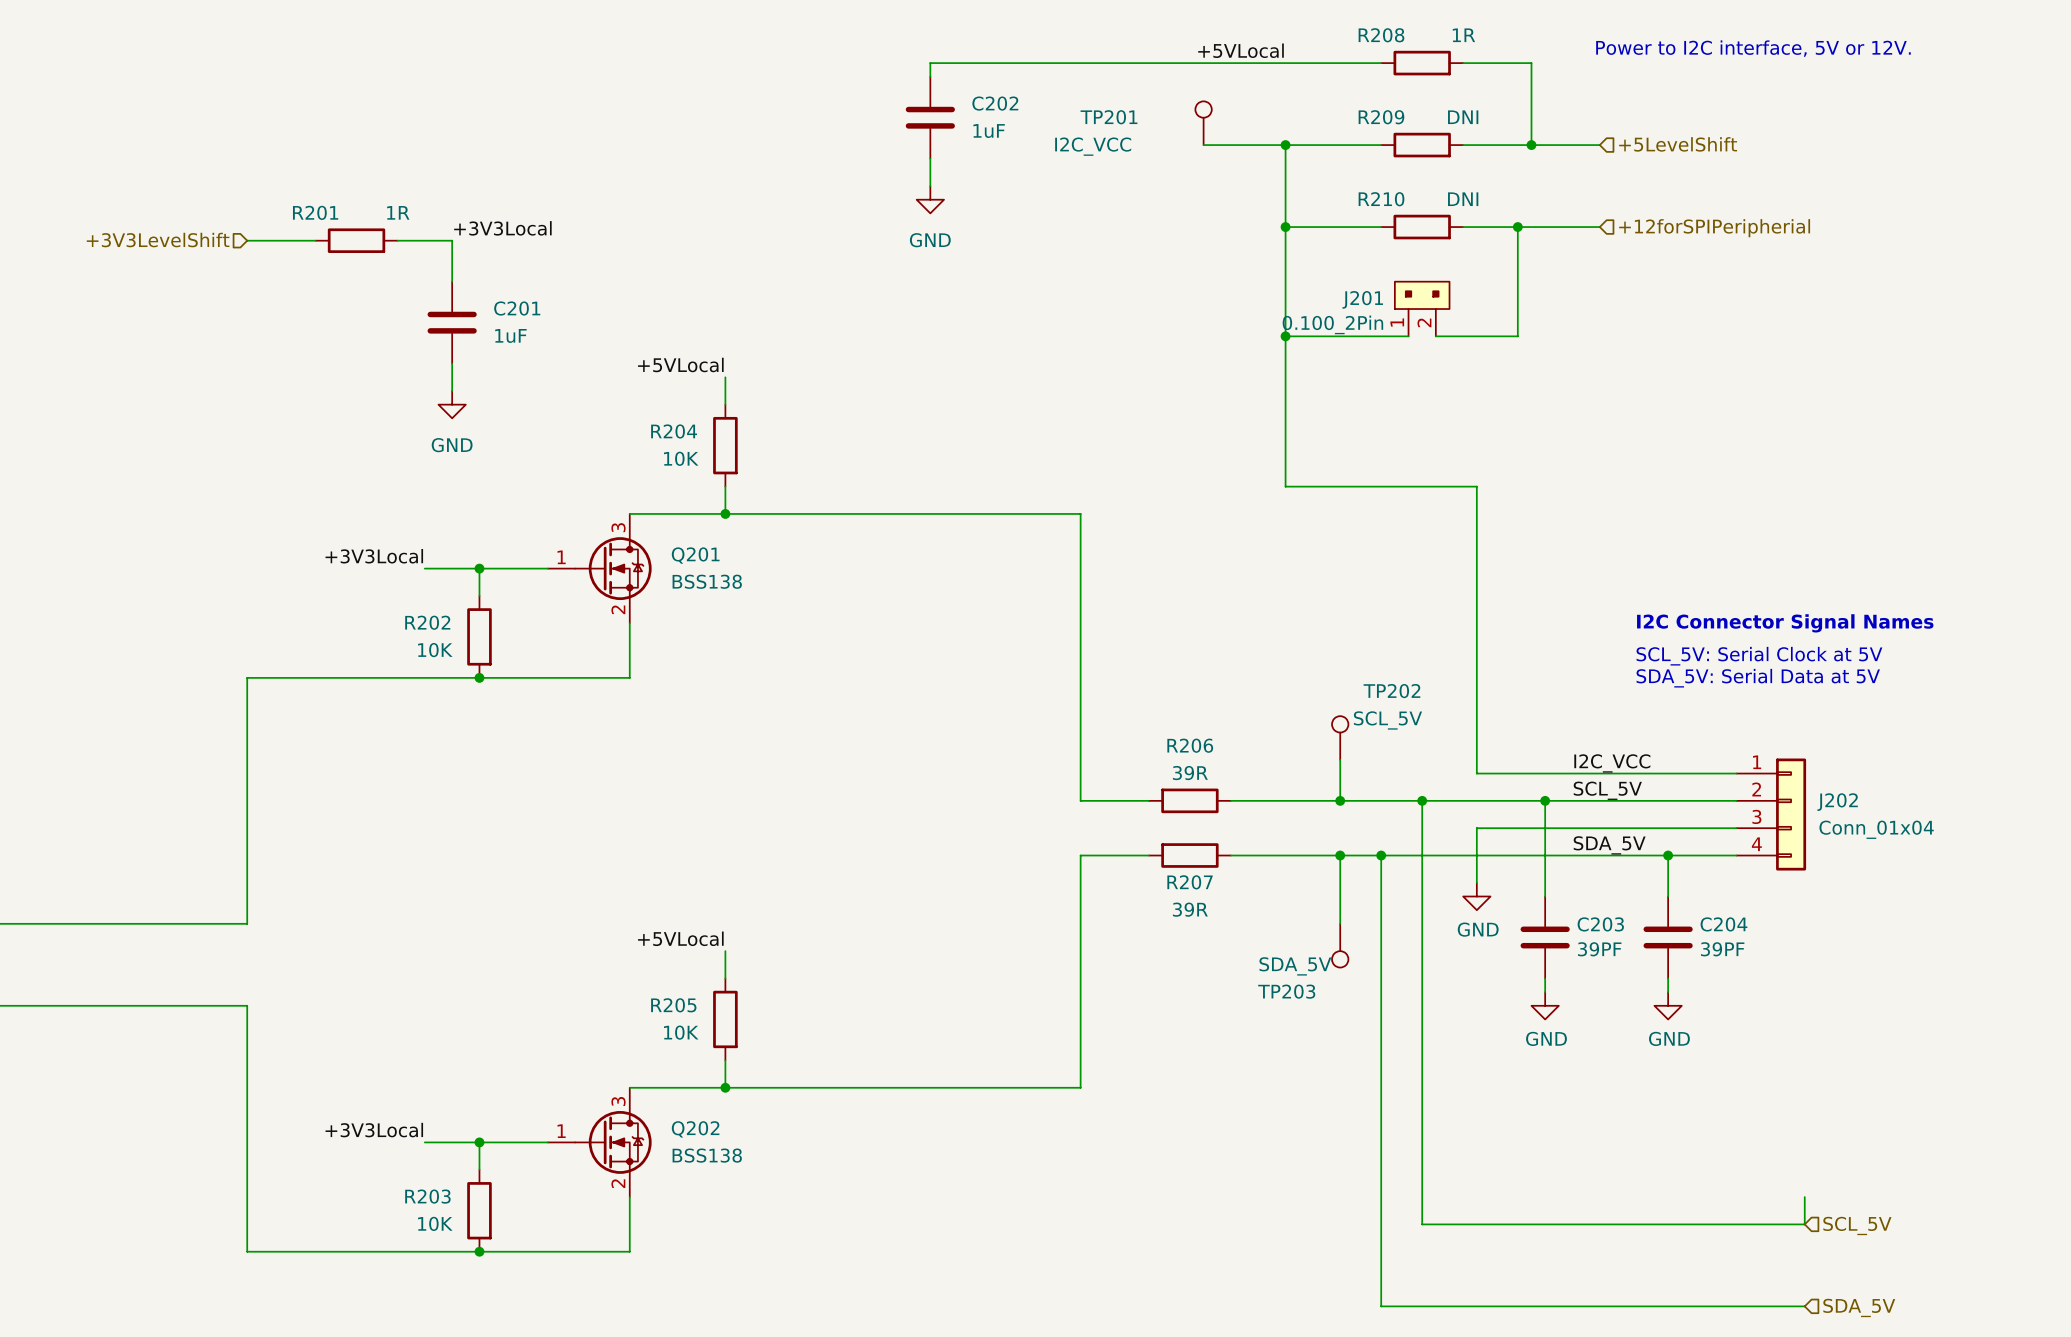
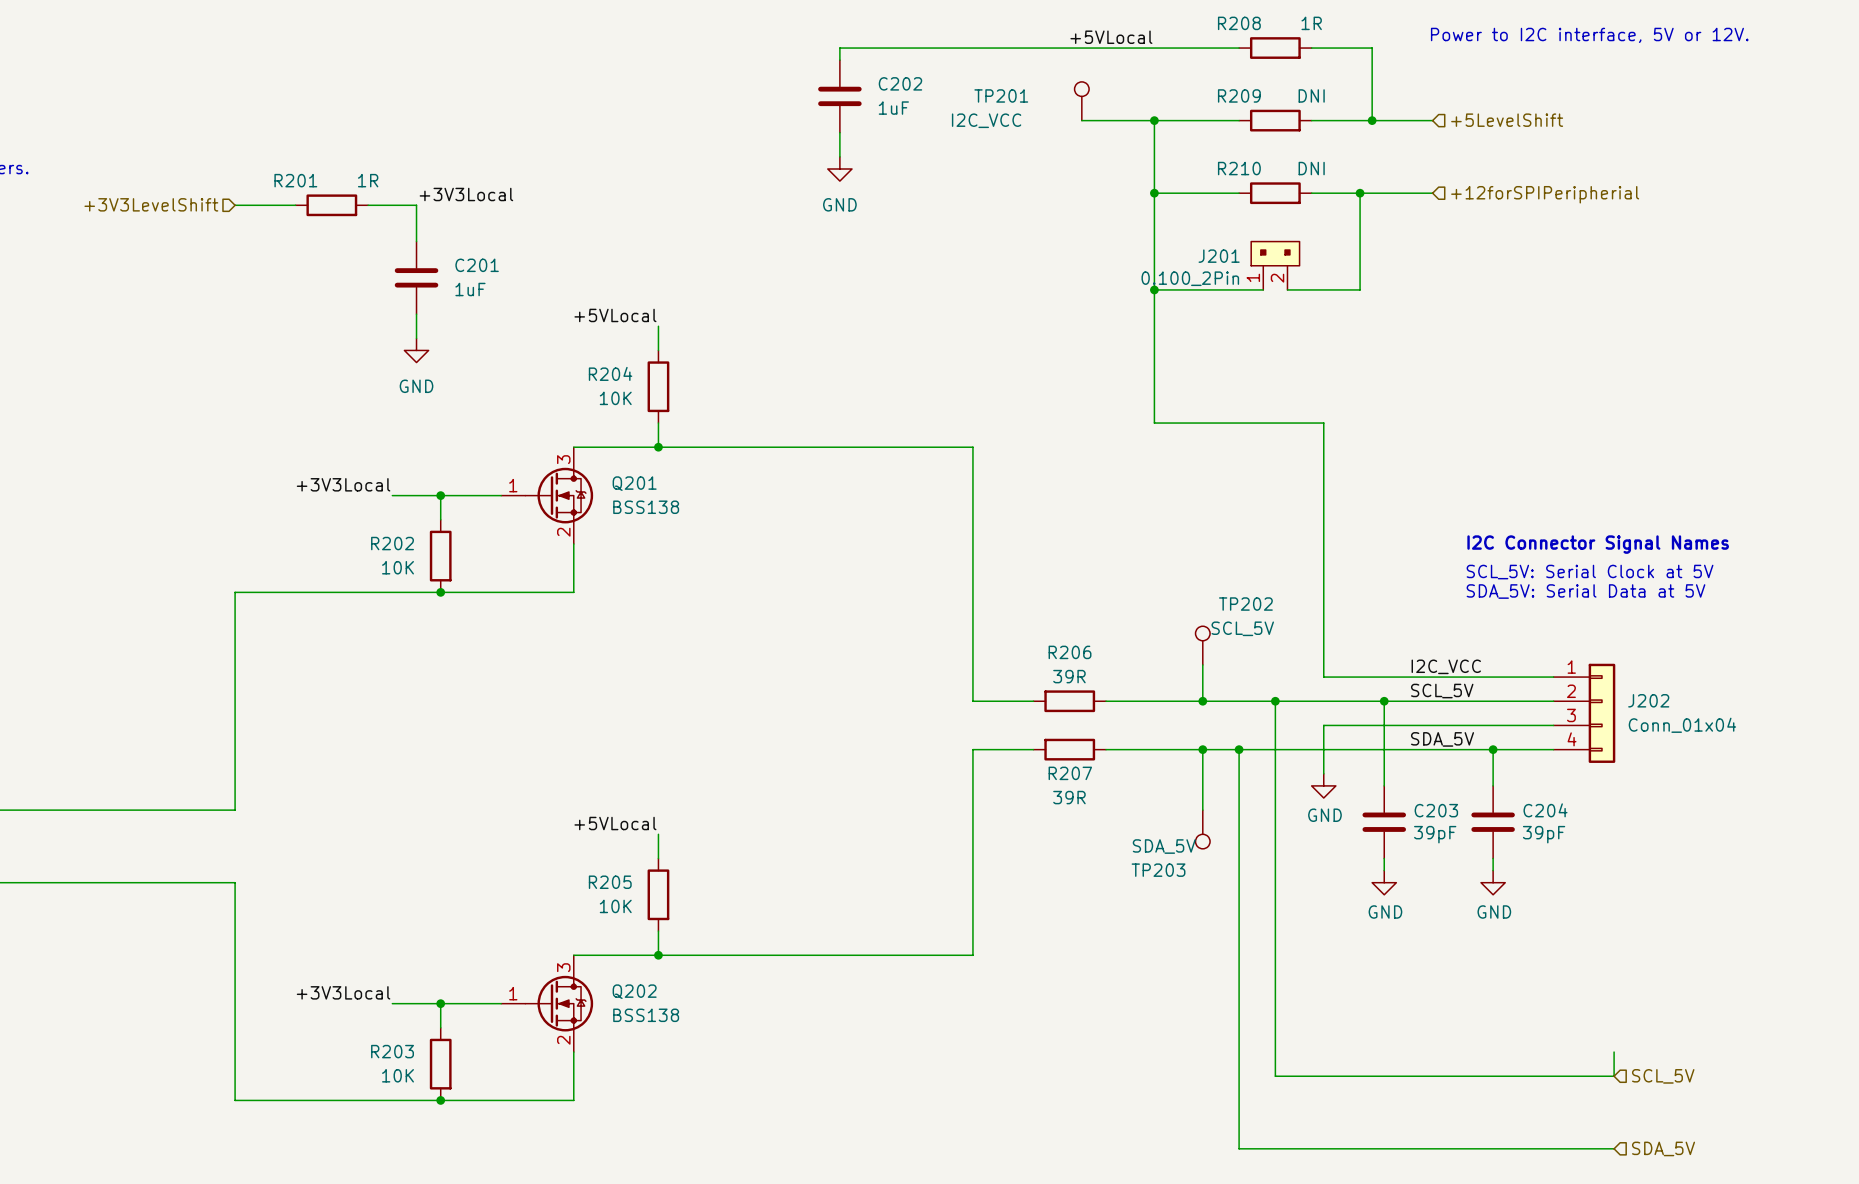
C203 value: 39PF (1599, 949) -> 39pF (1435, 834)
C204 value: 39PF (1722, 949) -> 39pF (1544, 834)

